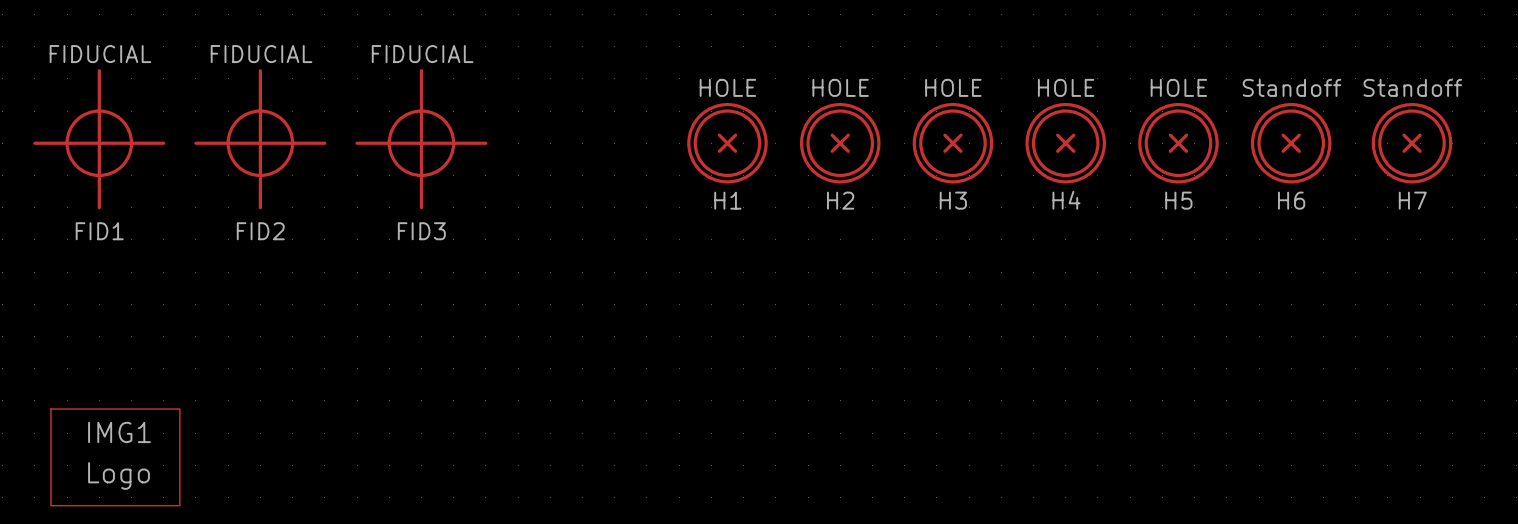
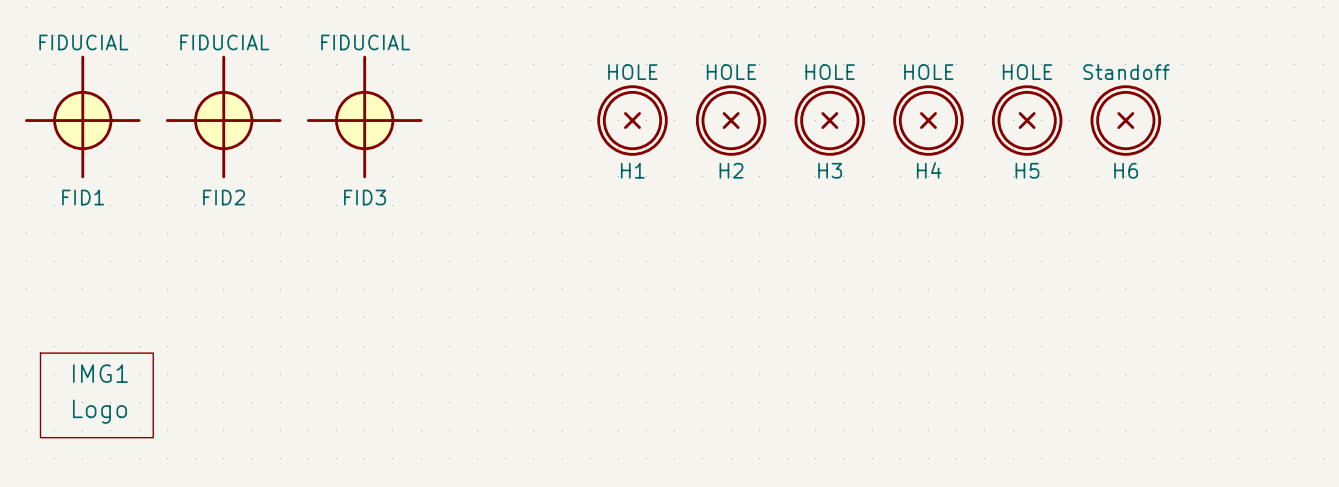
H7: Standoff (1412, 143) -> none

